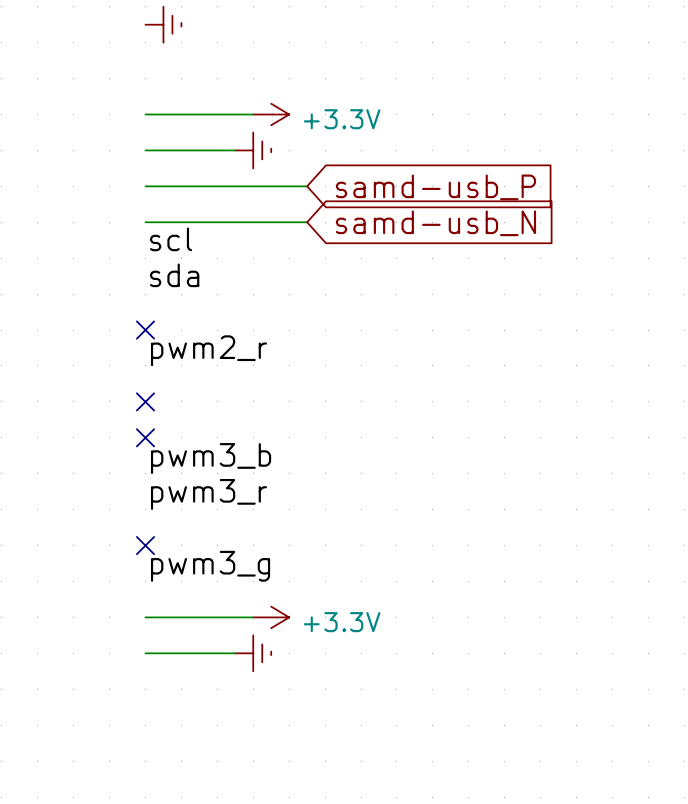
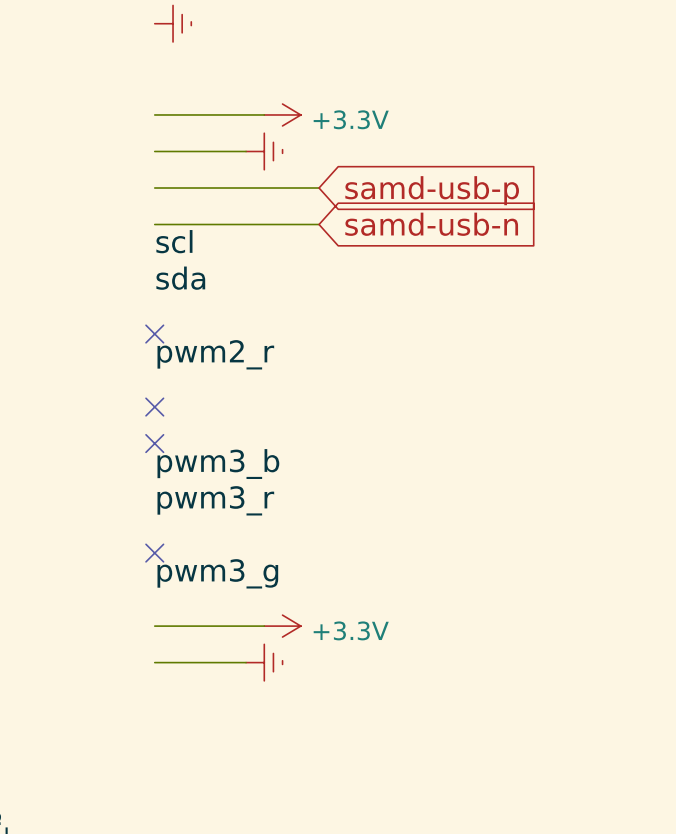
global label: samd-usb_P (435, 187) -> samd-usb-p (432, 190)
global label: samd-usb_N (435, 223) -> samd-usb-n (431, 224)

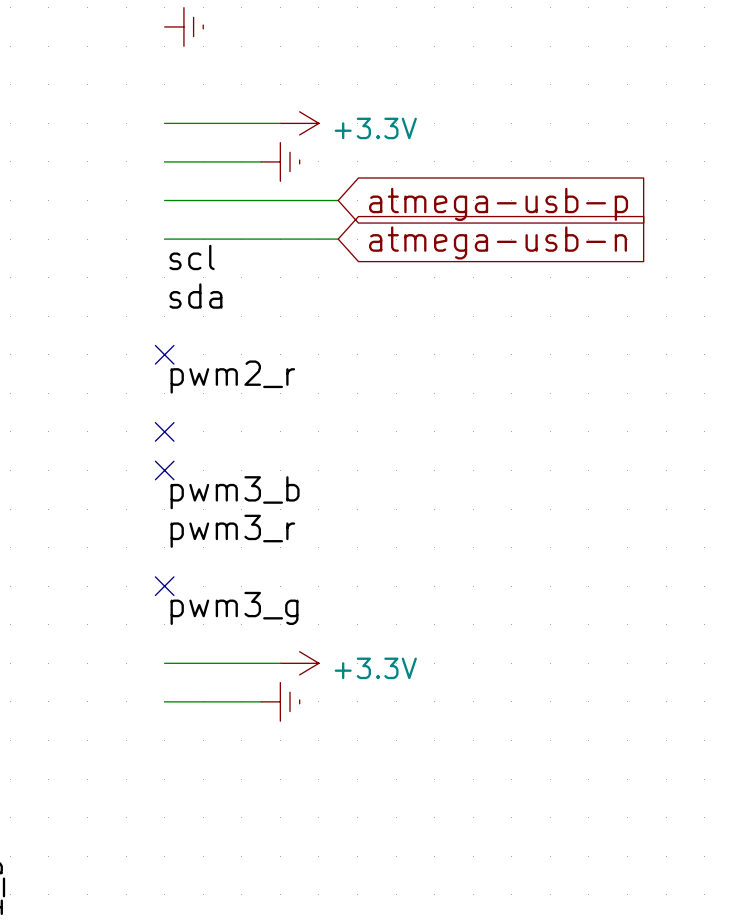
global label: samd-usb-p (432, 190) -> atmega-usb-p (498, 204)
global label: samd-usb-n (431, 224) -> atmega-usb-n (497, 242)

